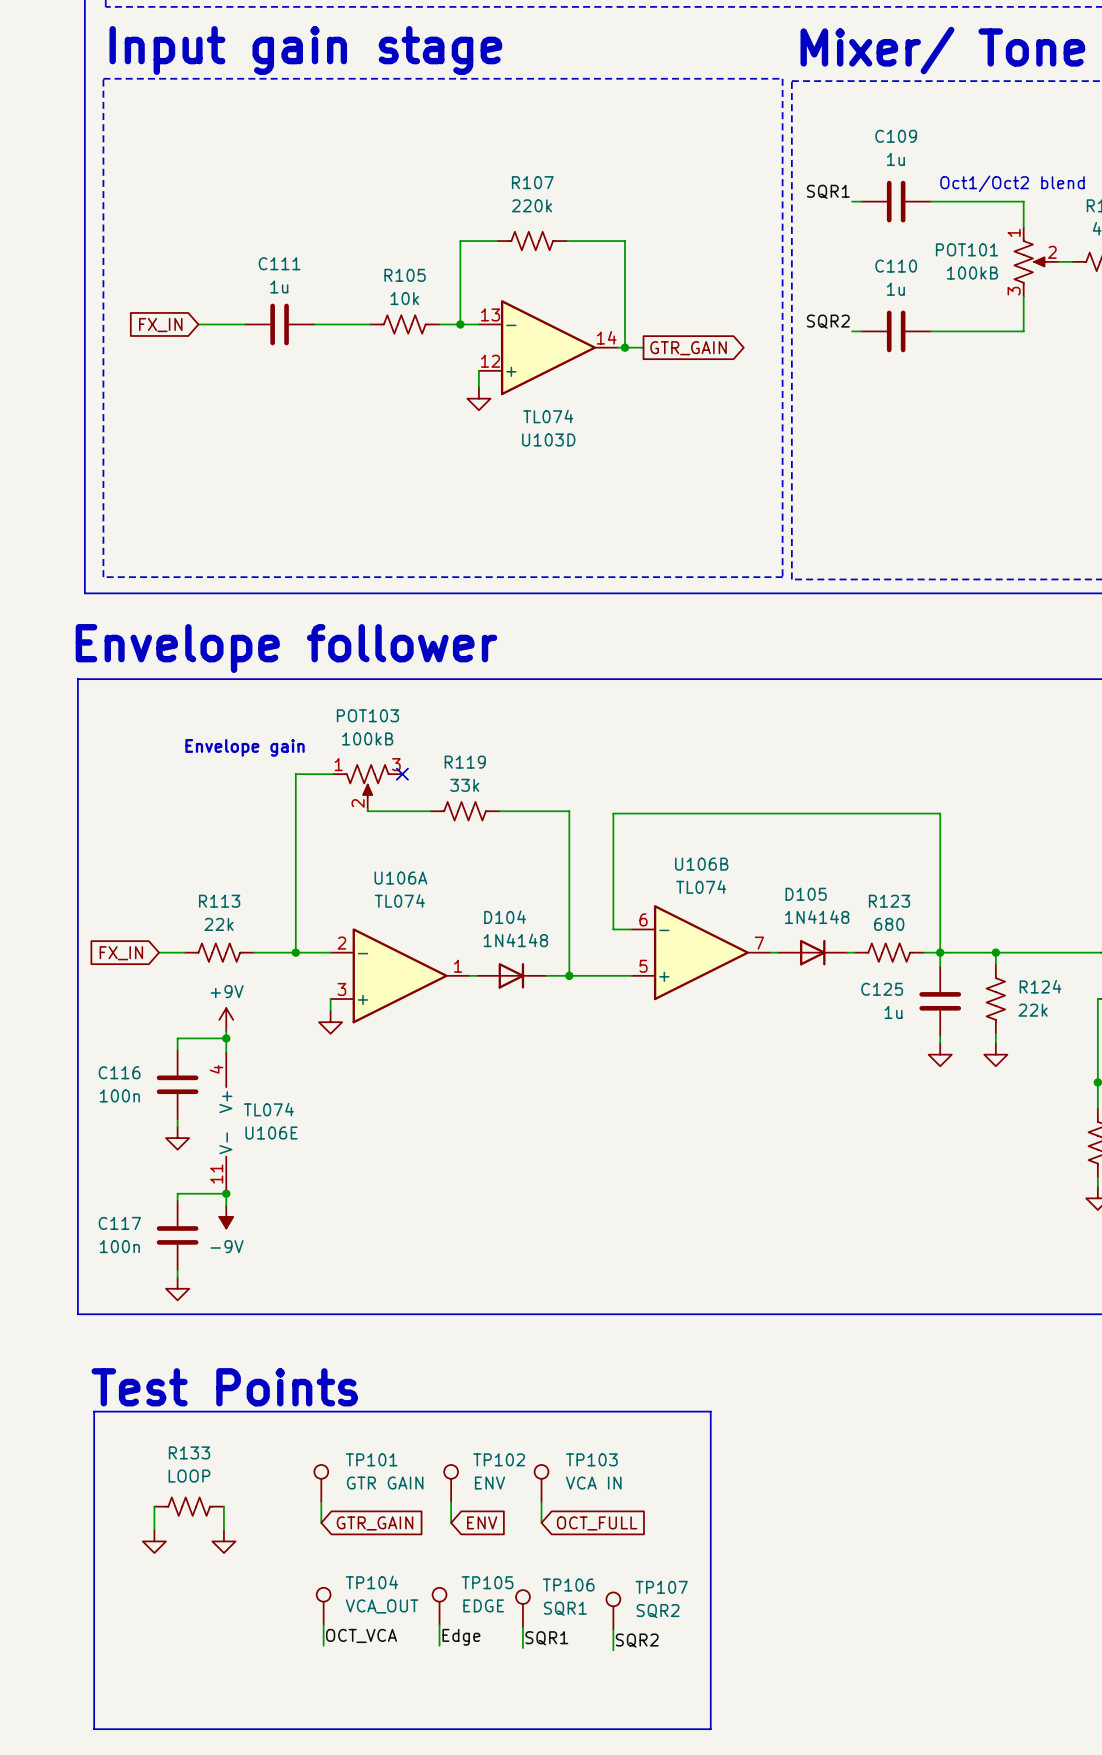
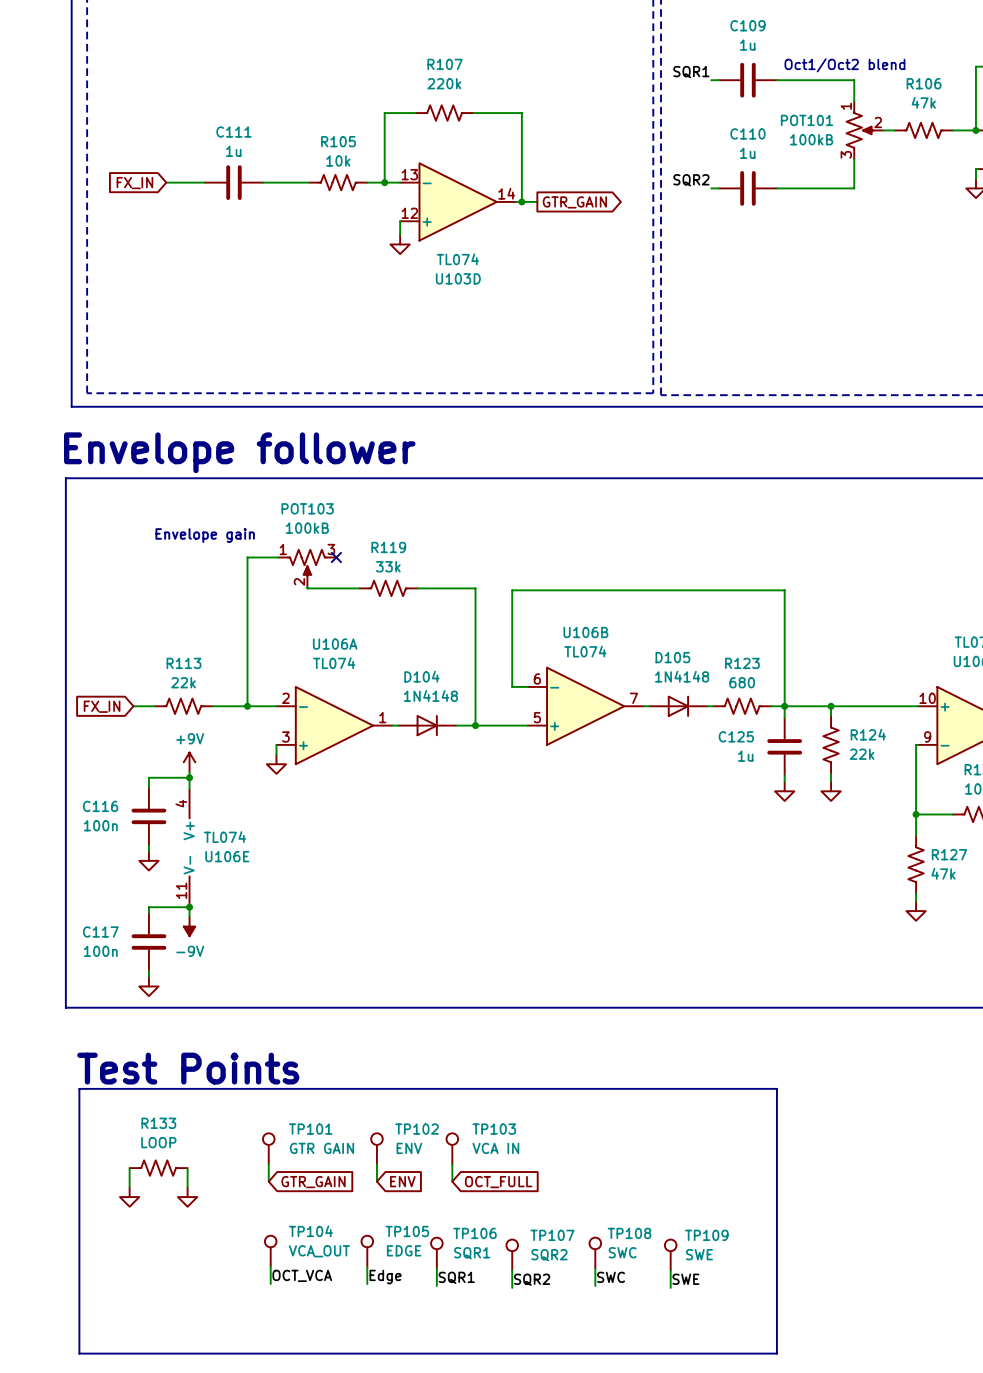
line: (710, 1411) (710, 1729) -> (593, 1088) (776, 1088) (776, 1353) (593, 1353)
TP108: none -> SWC (595, 1253)
TP109: none -> SWE (670, 1255)
wire: none -> (595, 1268) (595, 1285)
wire: none -> (670, 1270) (670, 1287)
label: none -> SWC (611, 1277)
label: none -> SWE (685, 1279)

